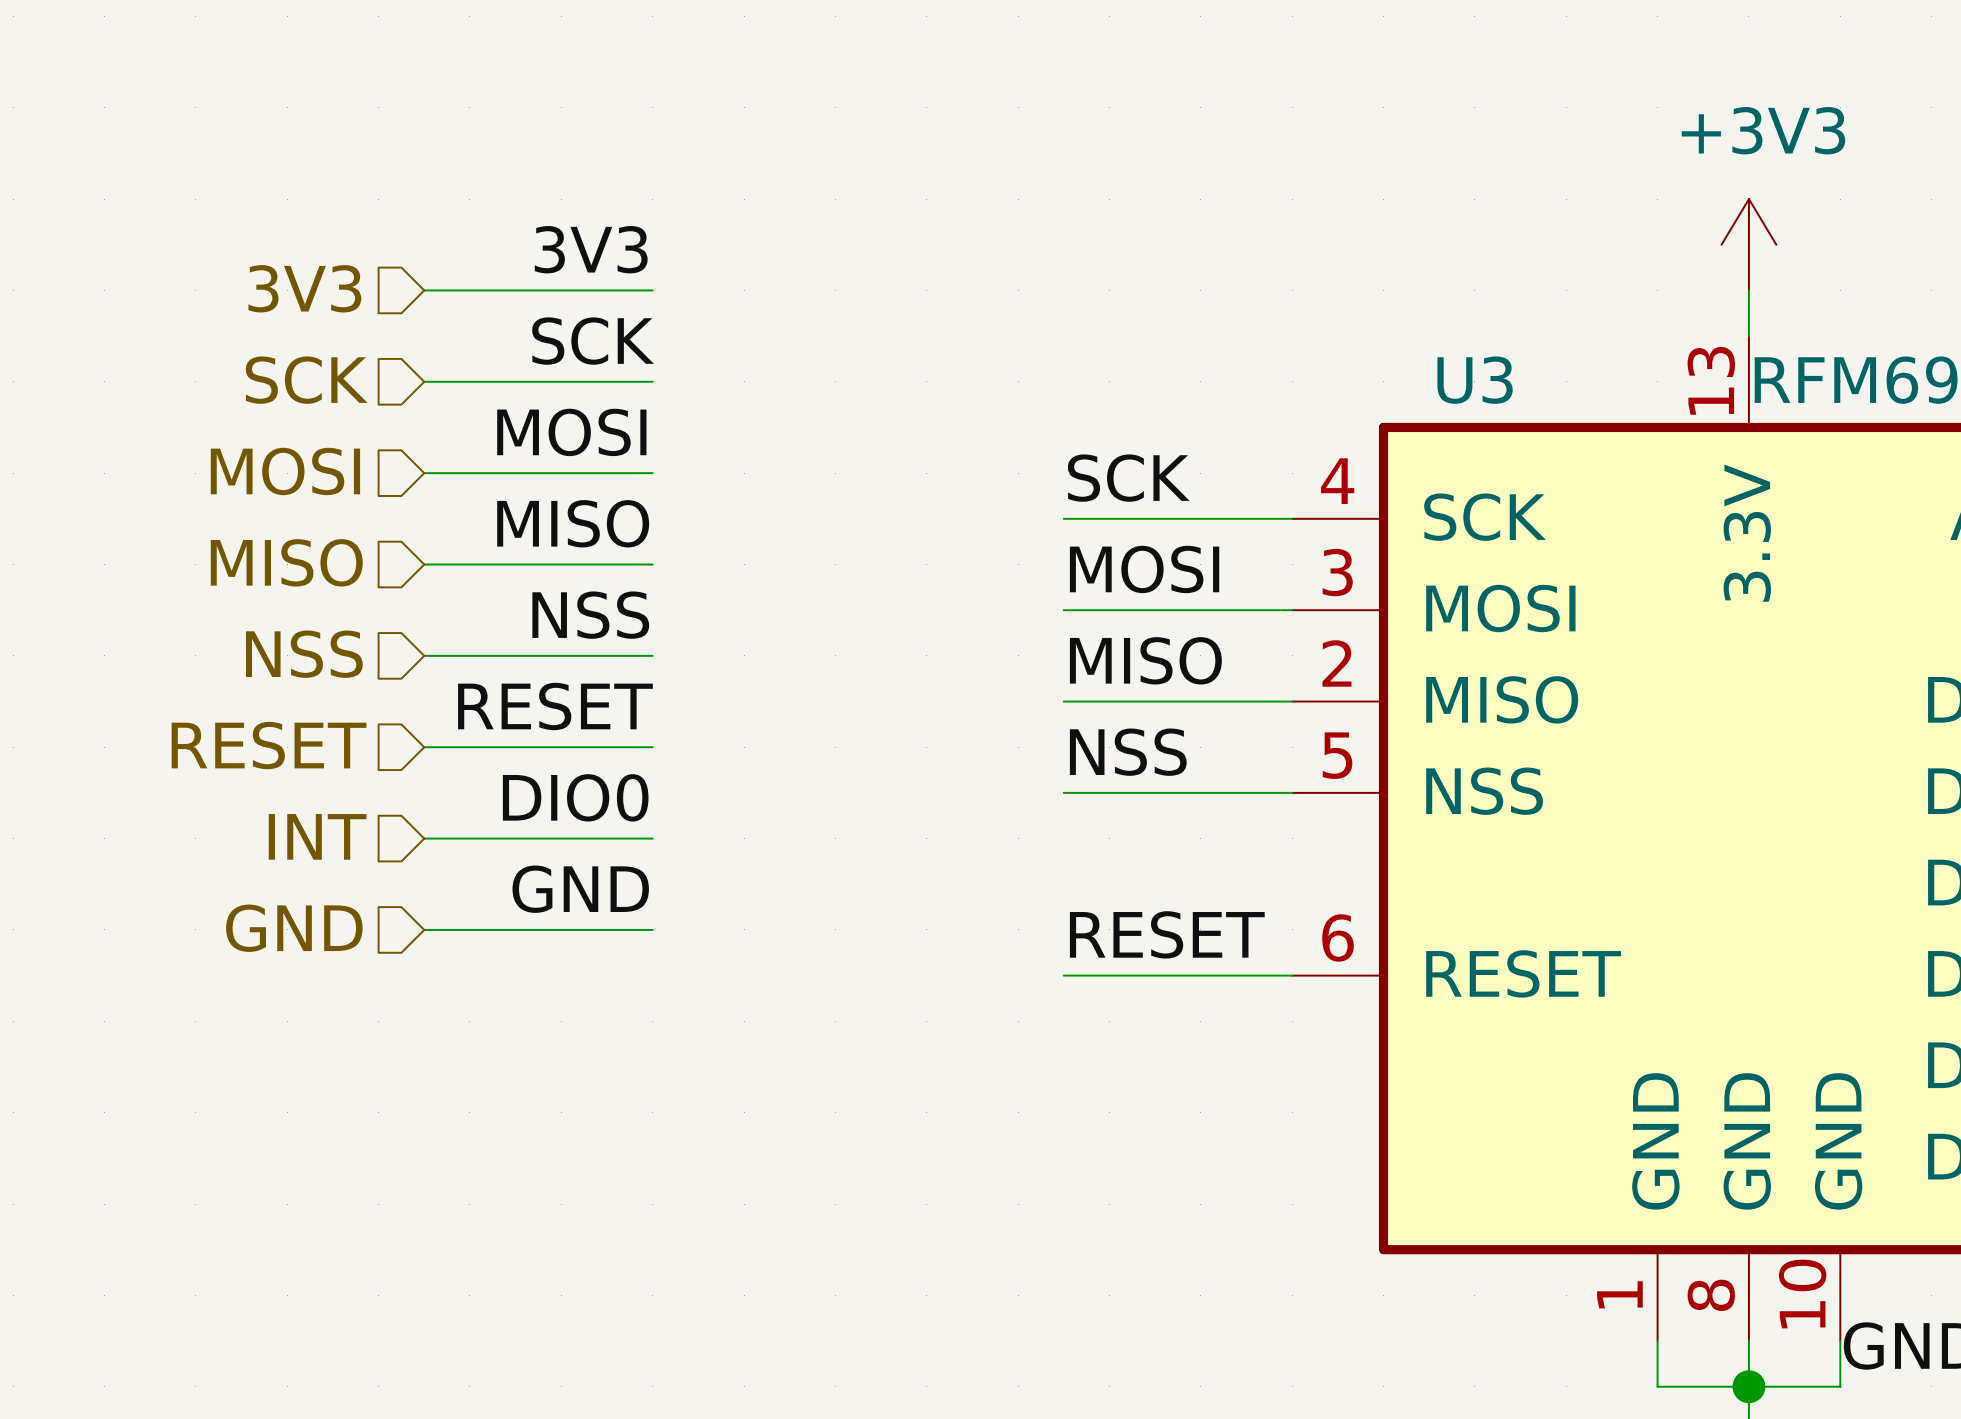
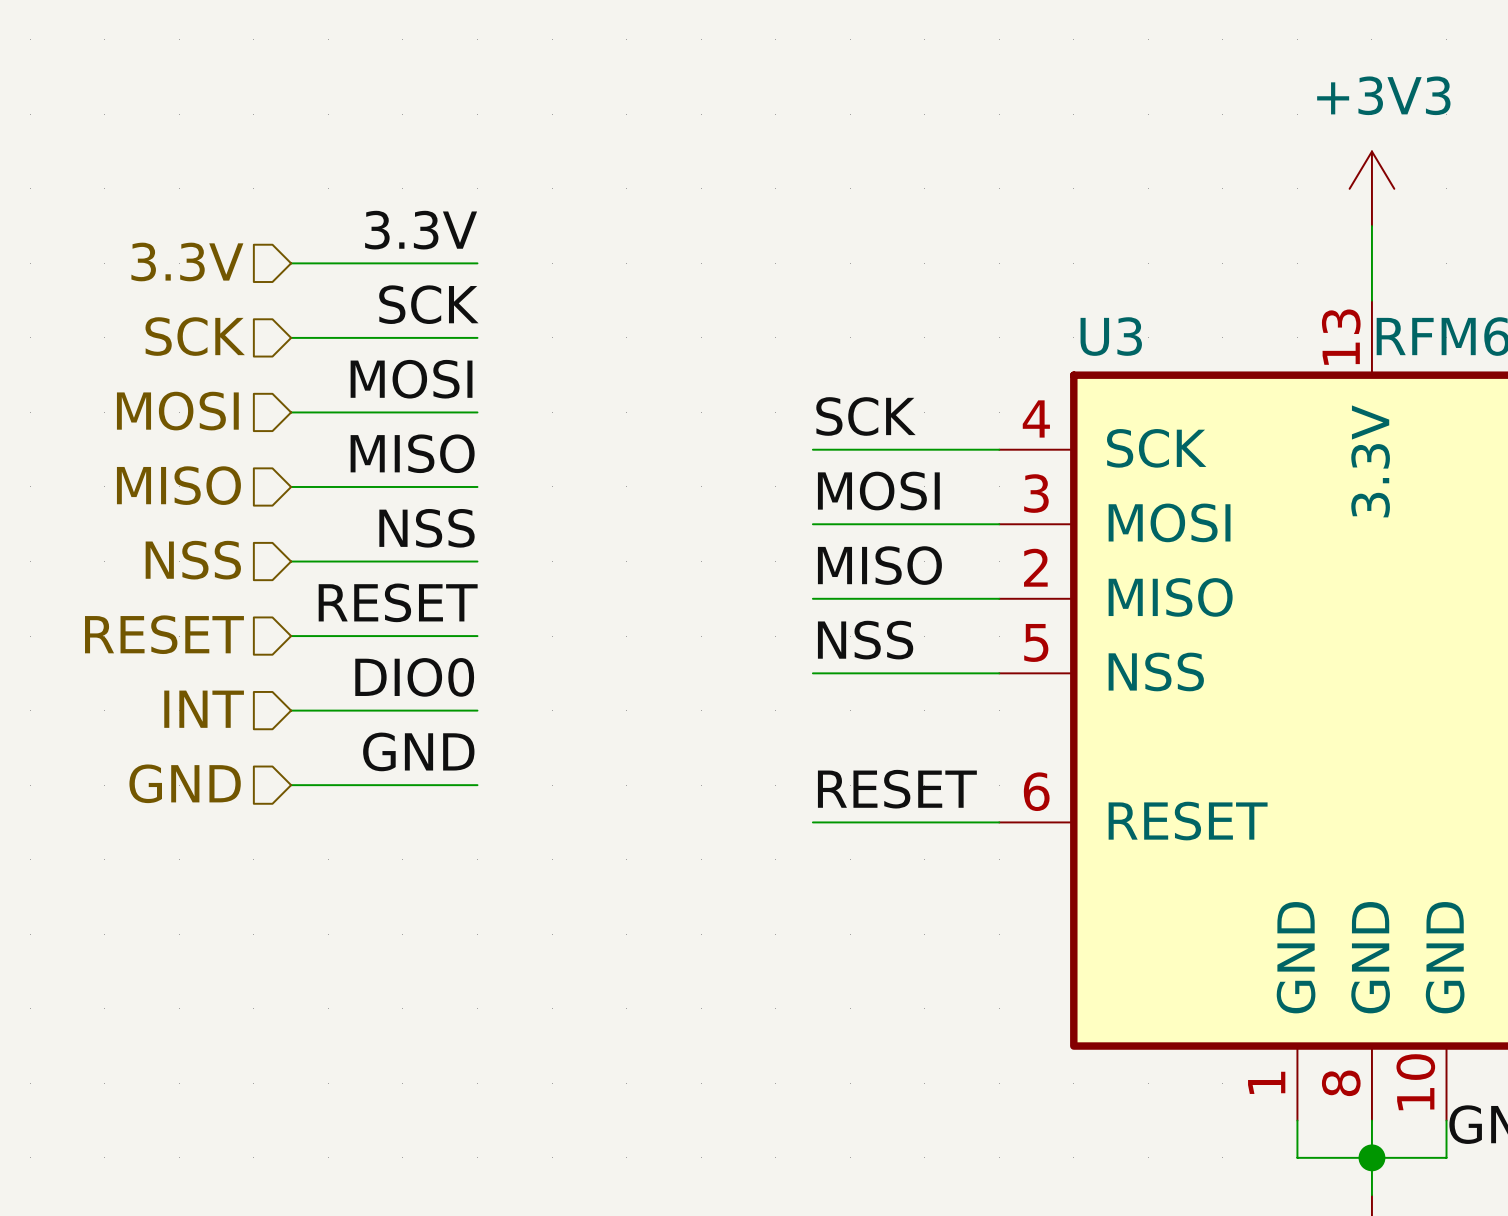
power symbol position: +3V3 (1748, 244) -> +3V3 (1371, 188)
label: 3V3 (591, 249) -> 3.3V (421, 230)
hierarchical label: 3V3 (304, 288) -> 3.3V (187, 262)
U3 name position: U3 (1475, 380) -> U3 (1111, 336)

